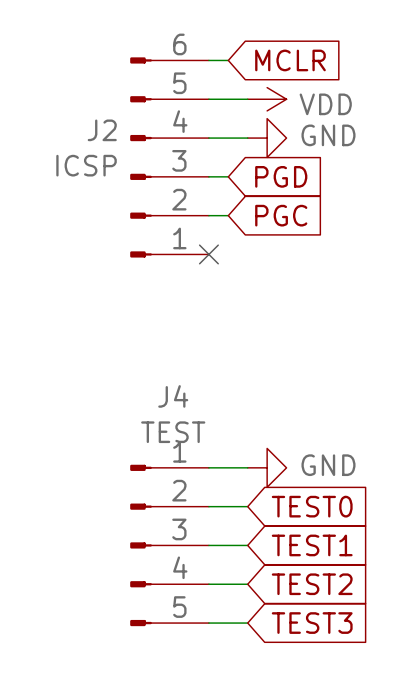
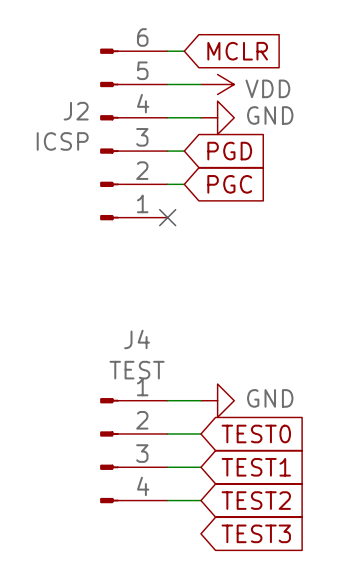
J4 symbol: [130, 464, 209, 627] -> [100, 398, 168, 504]
wire: (208, 623) (247, 623) -> none

